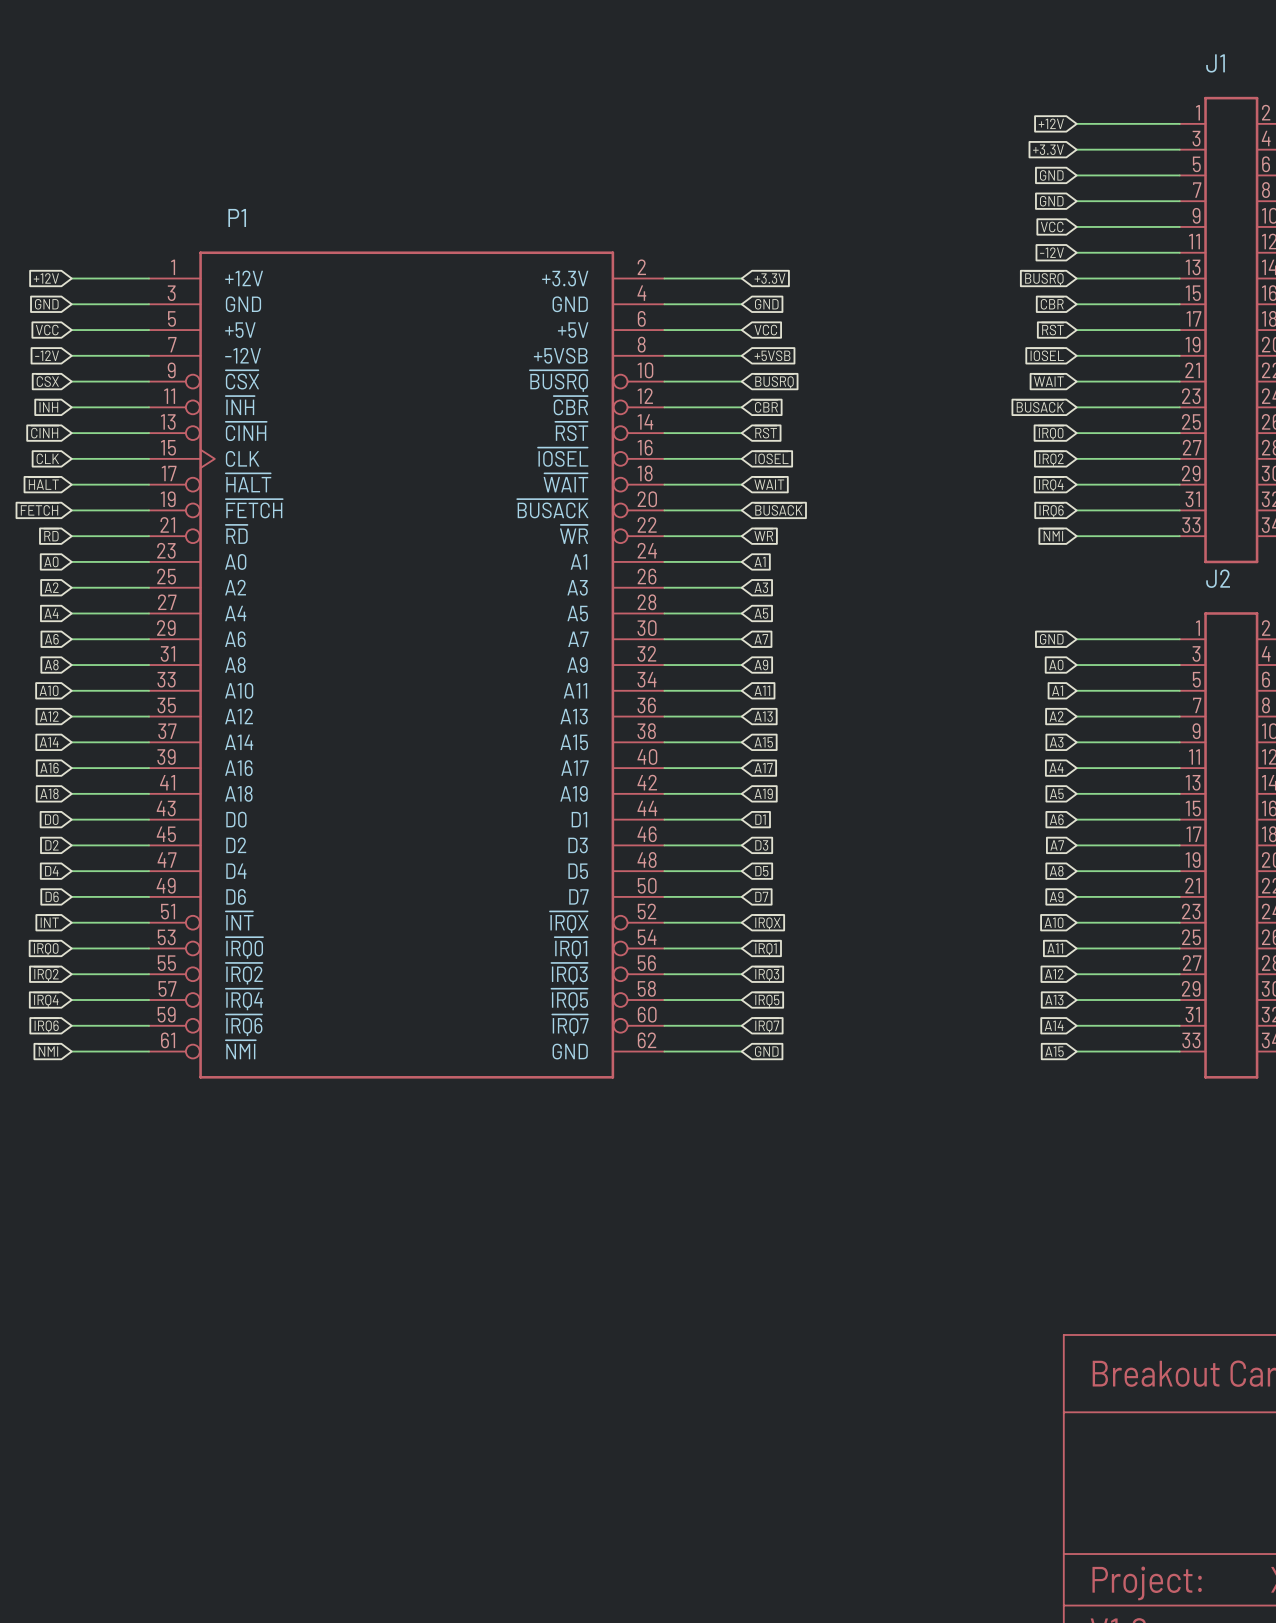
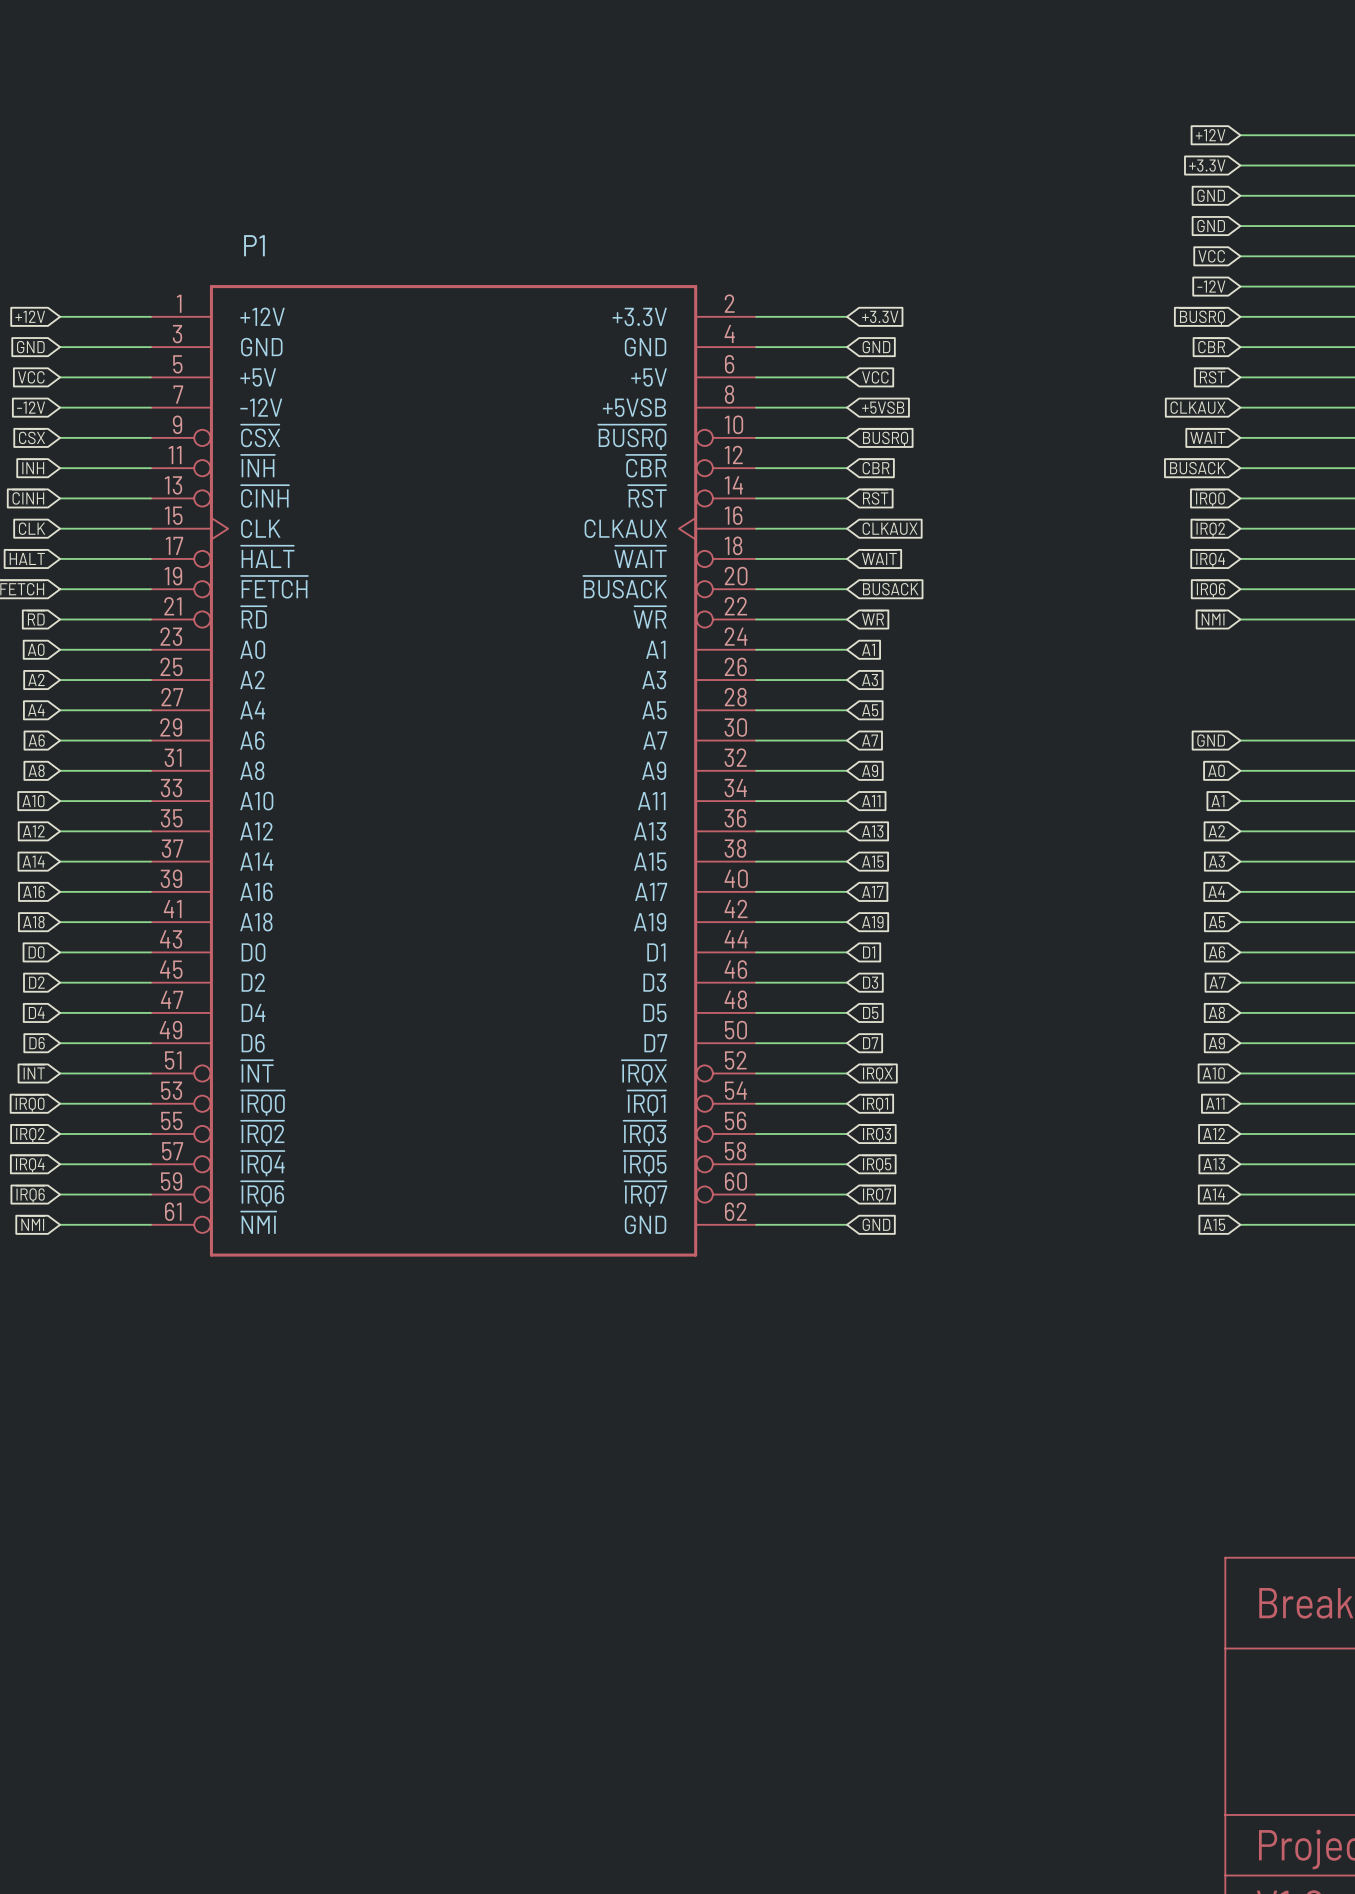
P1 symbol: [149, 251, 665, 1079] -> [150, 285, 757, 1257]
global label: ~{IOSEL} (1047, 354) -> CLKAUX (1197, 407)
global label: ~{IOSEL} (771, 457) -> CLKAUX (890, 528)

